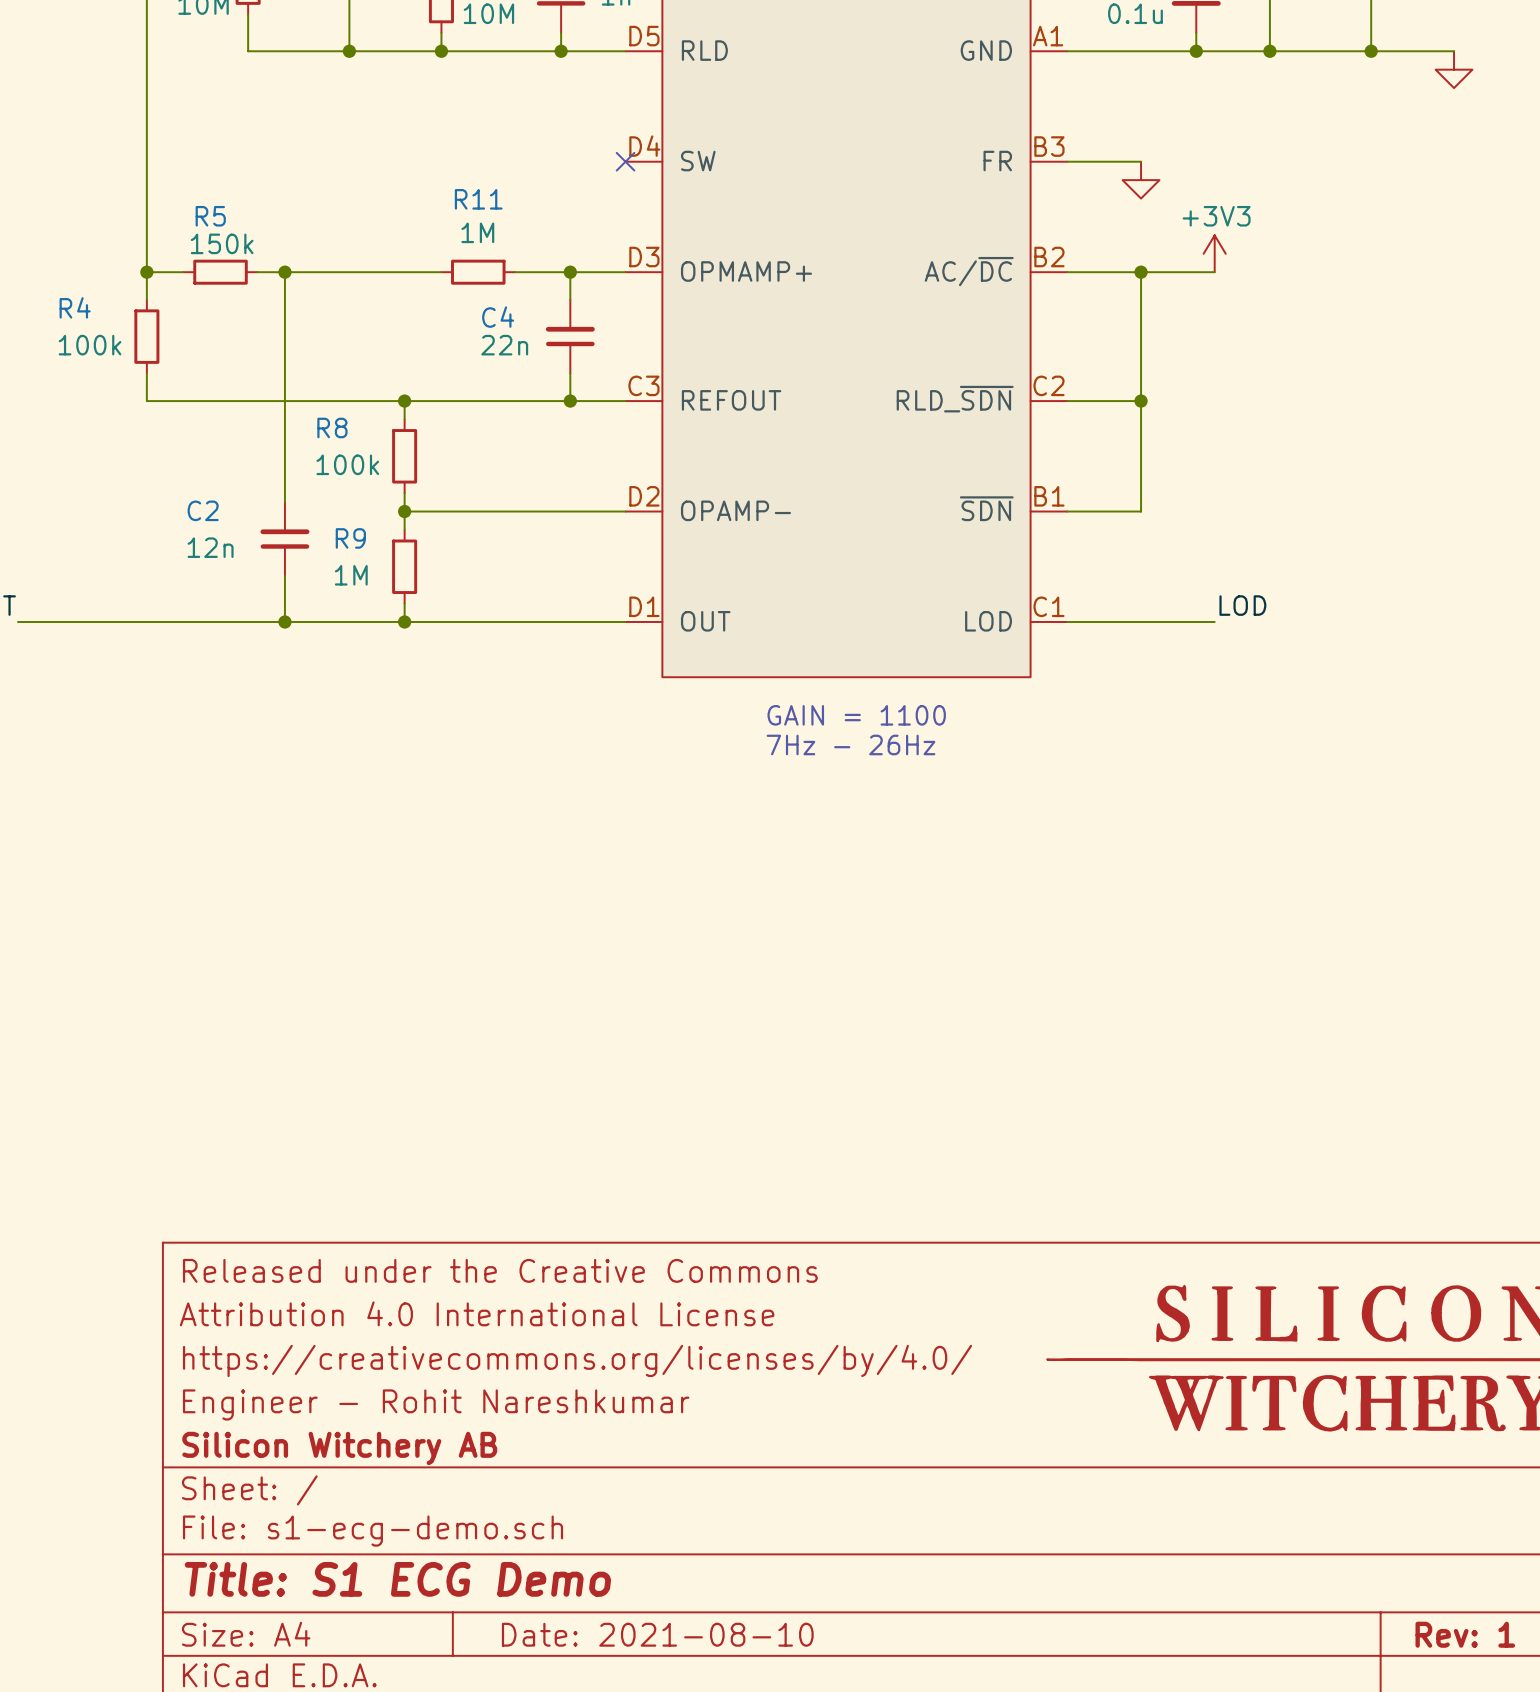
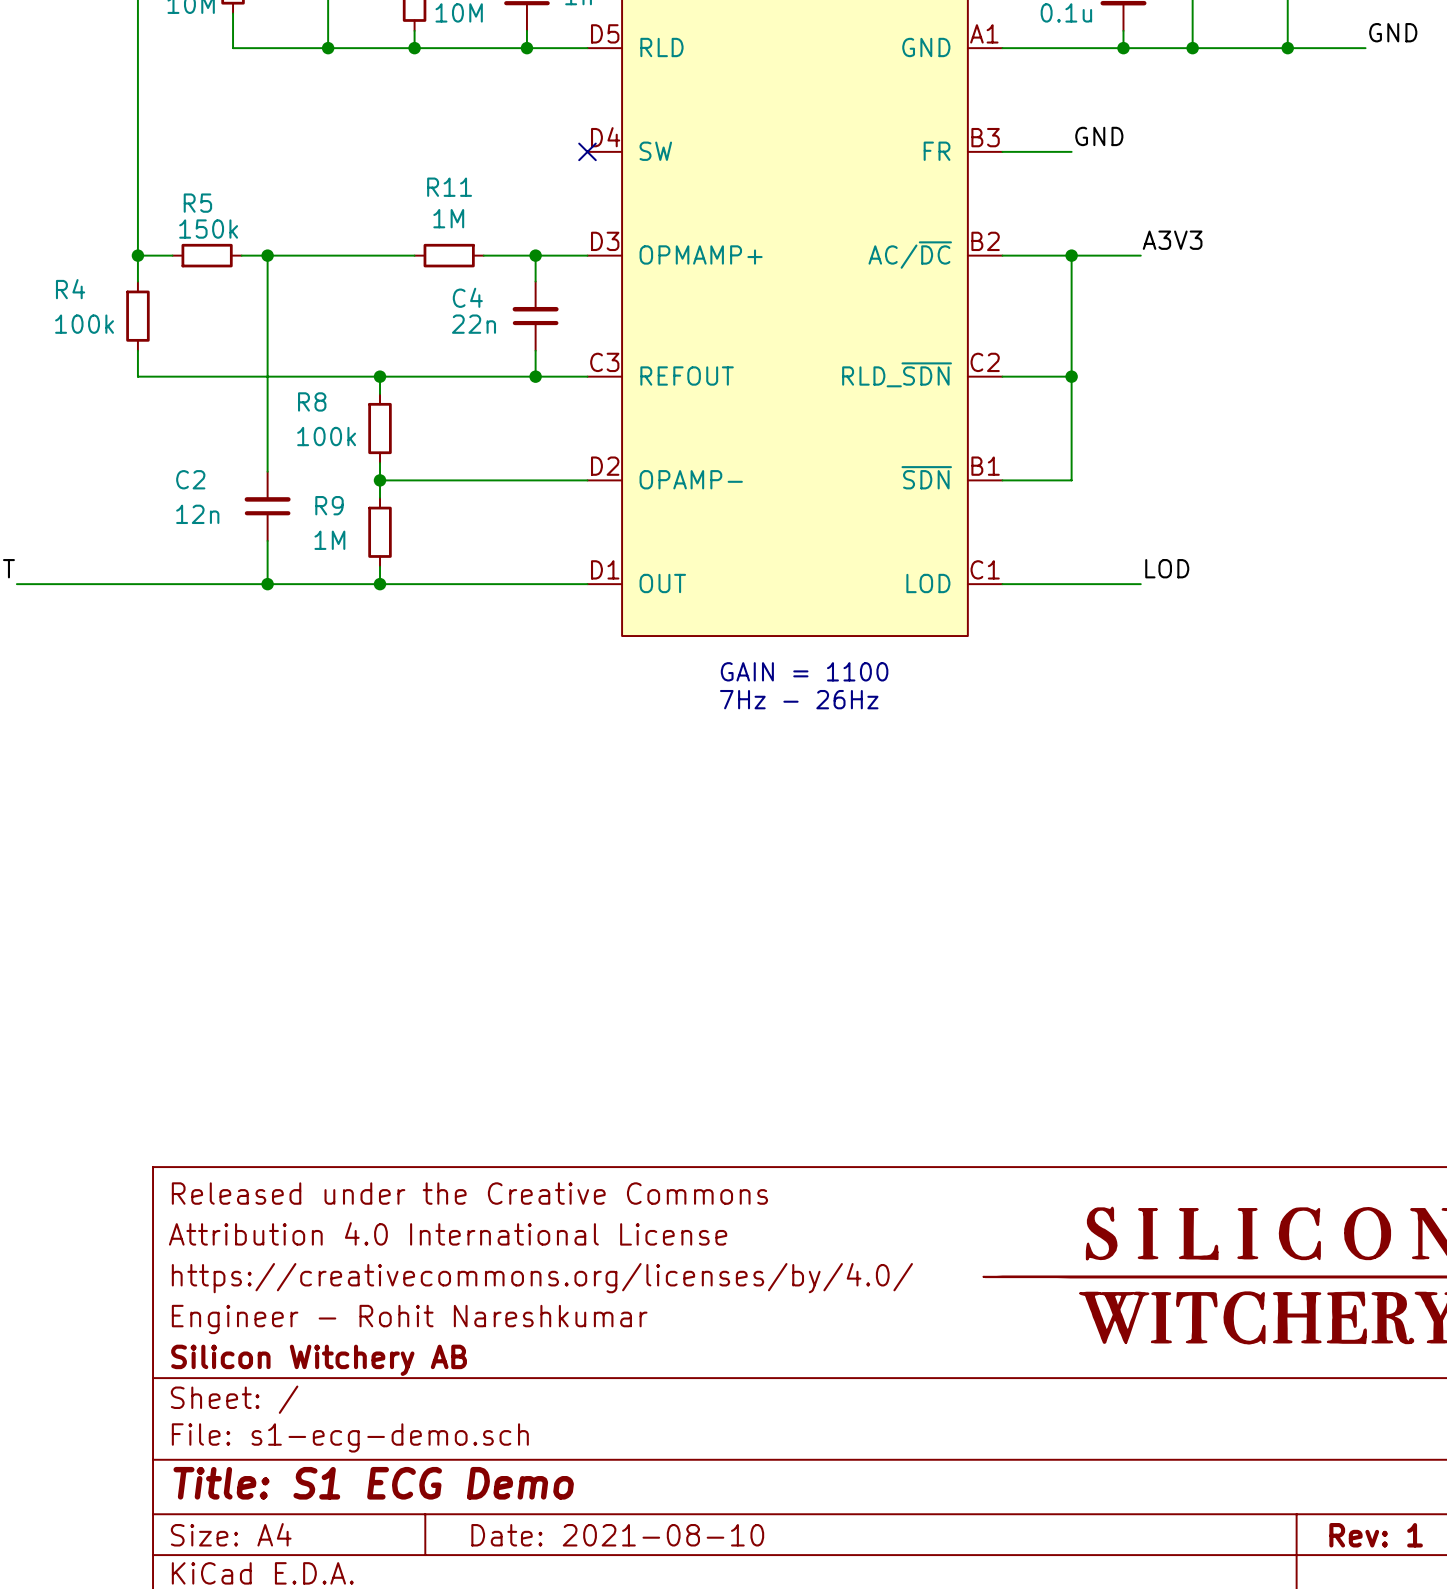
label: none -> GND (1393, 32)
power symbol: (1454, 69) -> none
label: none -> GND (1099, 136)
power symbol: (1141, 180) -> none
power symbol: +3V3 (1214, 253) -> none
label: none -> A3V3 (1172, 240)

